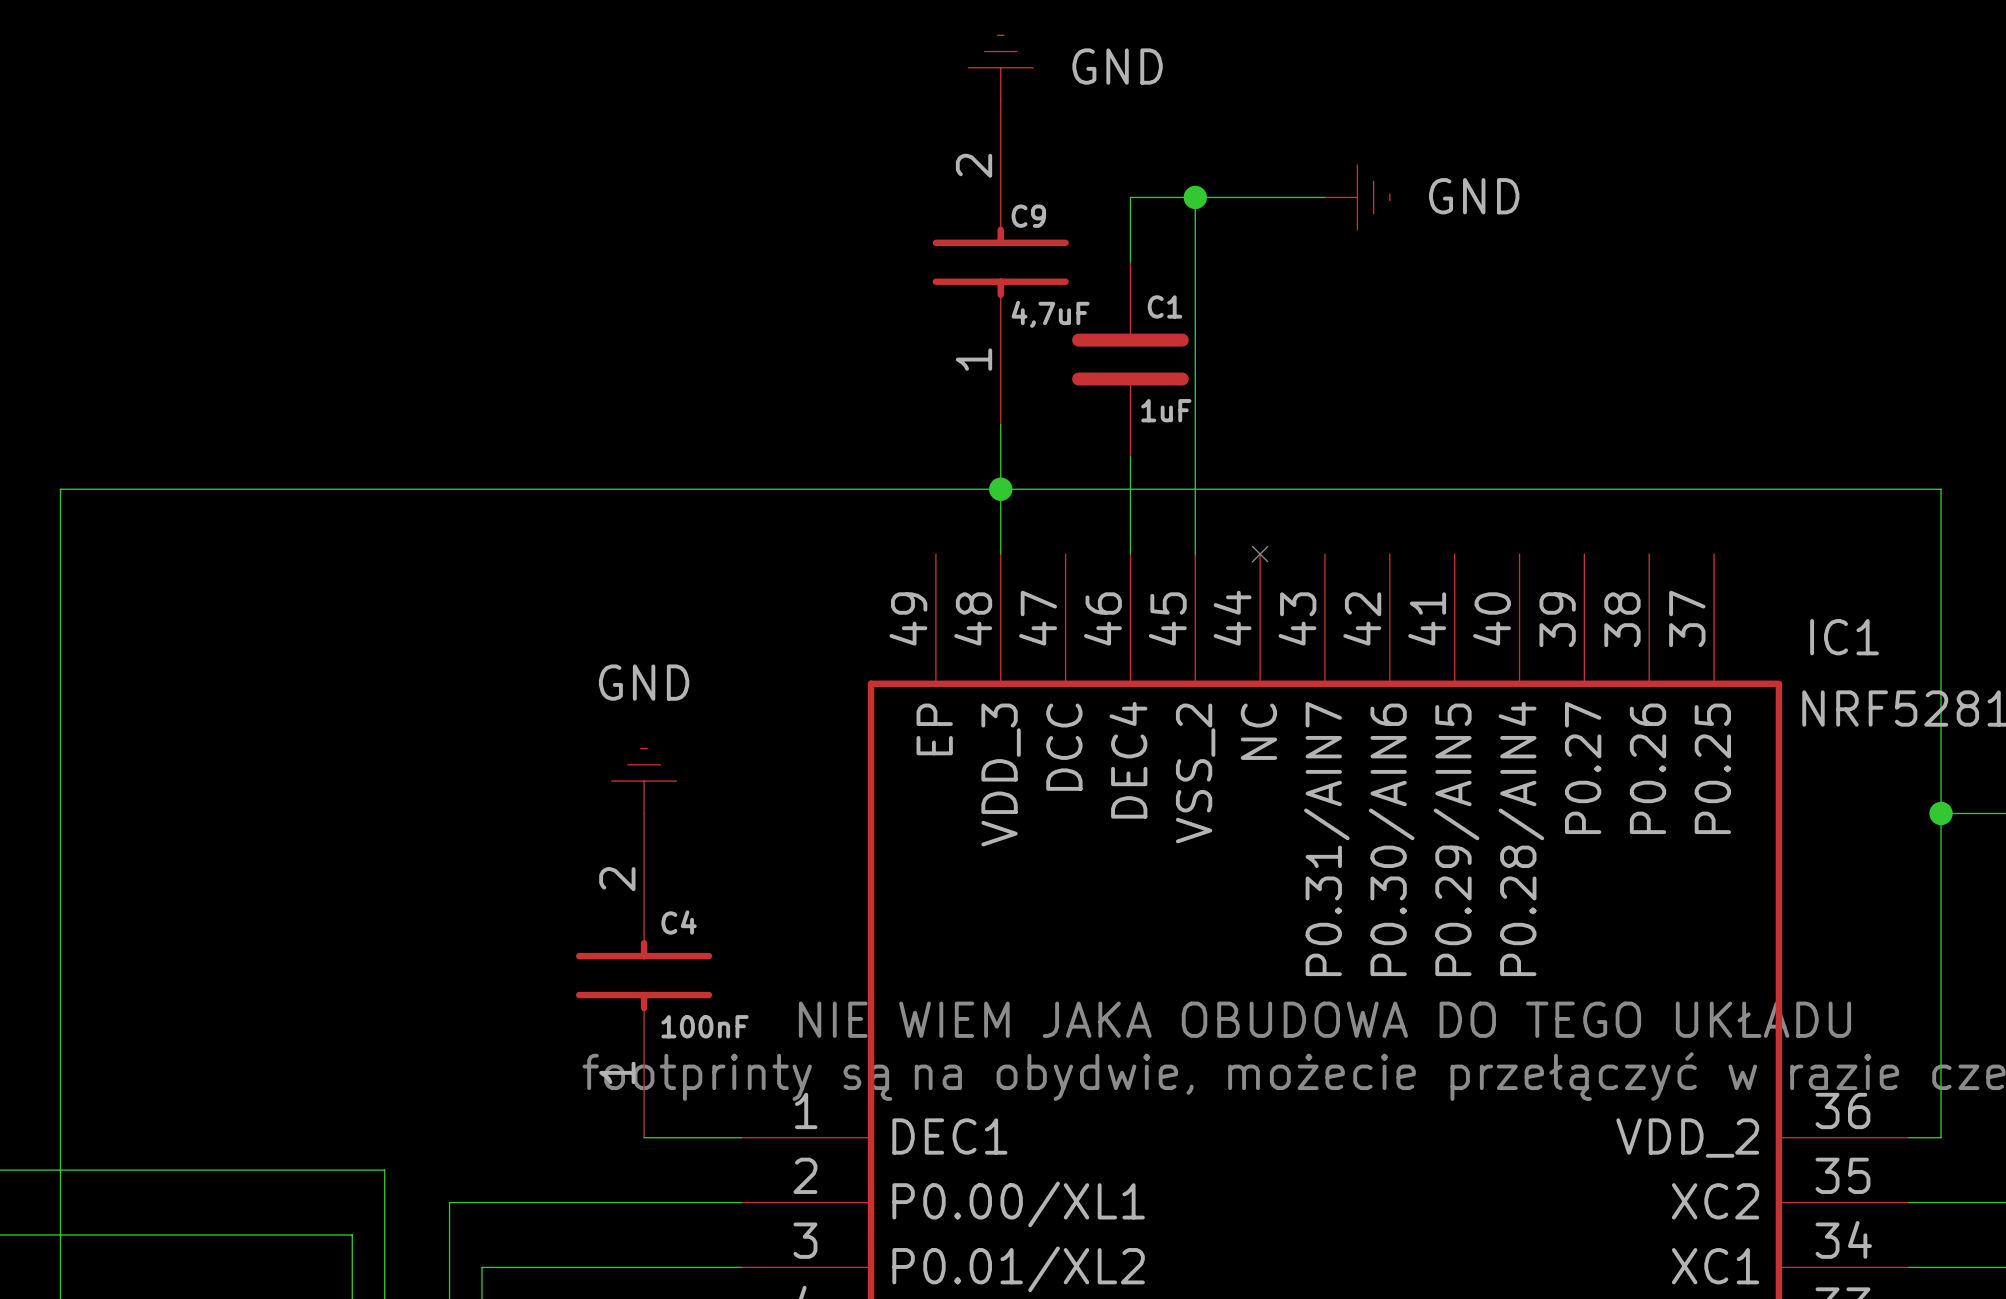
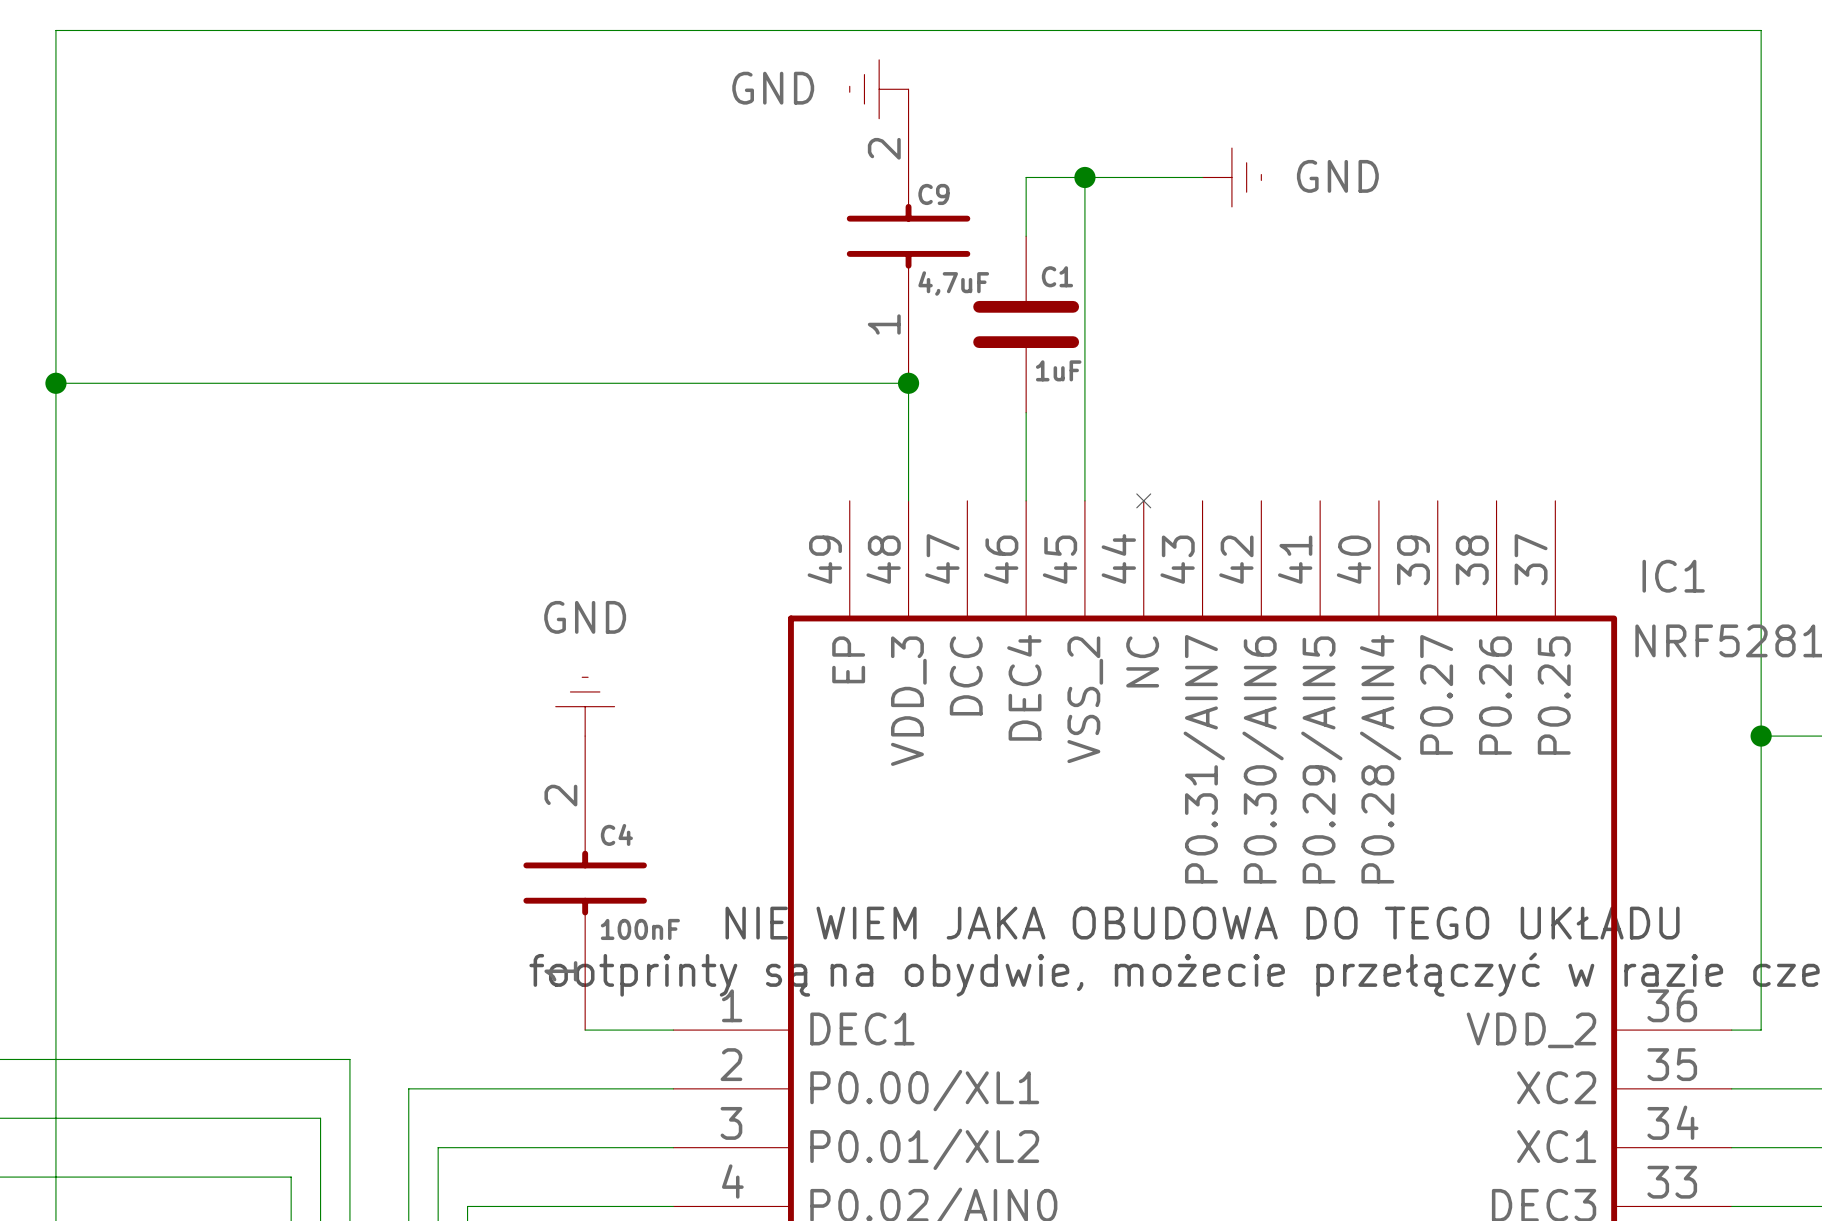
power symbol text position: GND (1117, 66) -> GND (773, 88)
power symbol rotation: 0° (1000, 67) -> 90° counterclockwise (879, 89)
power symbol position: GND (1000, 67) -> GND (879, 89)
wire: none -> (55, 383) (908, 383)
junction: none -> (55, 383)
wire: (60, 489) (1941, 489) -> (55, 442) (55, 30) (1761, 30) (1761, 442)
junction position: (1000, 489) -> (908, 383)

